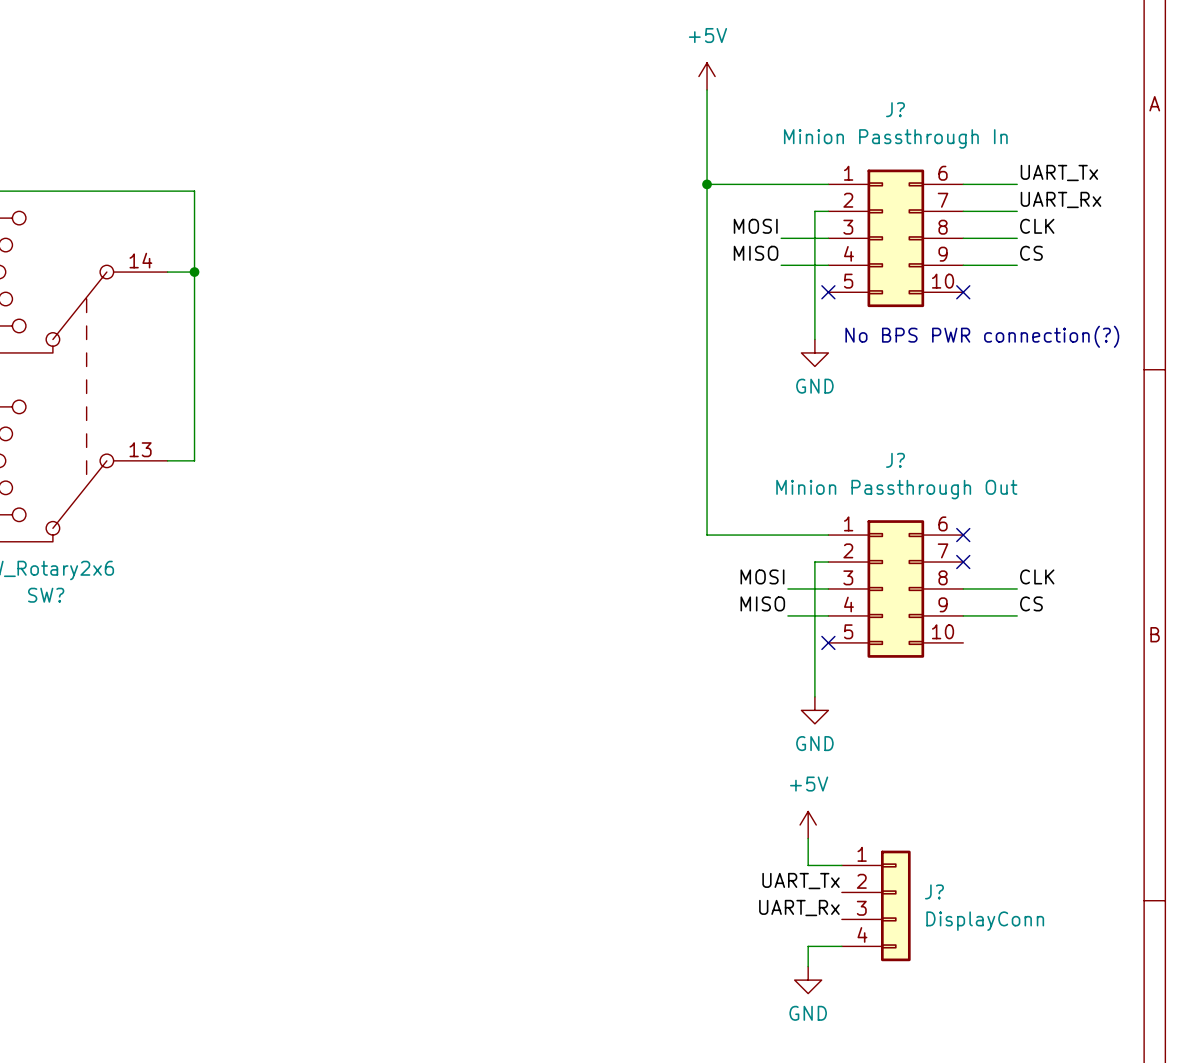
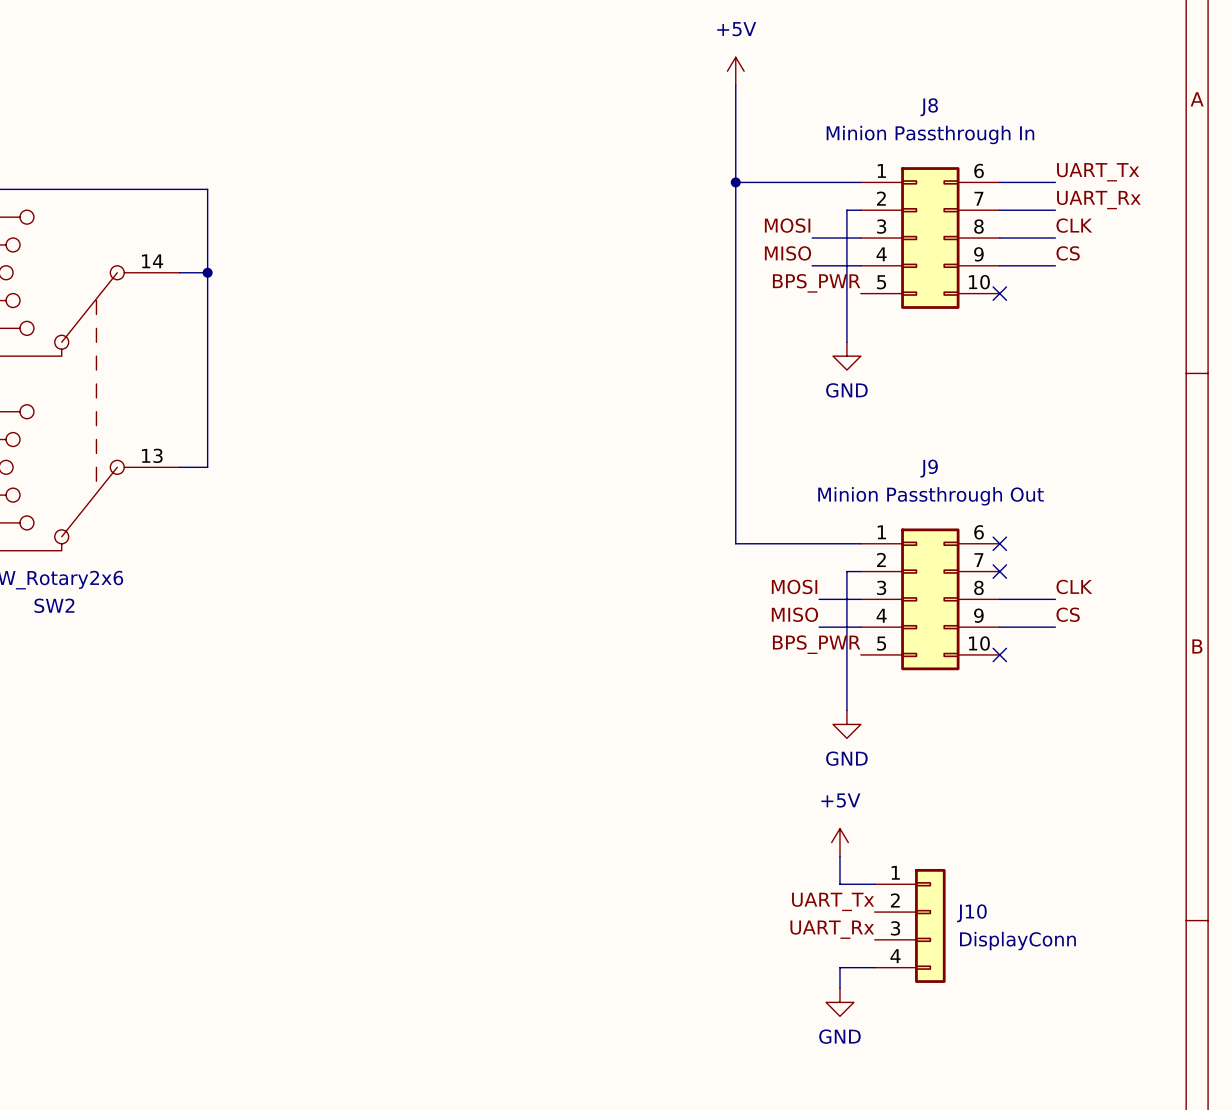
J? name: J? (895, 109) -> J8 (929, 107)
label: none -> BPS_PWR (816, 283)
no-connect mark: (828, 292) -> none
text: No BPS PWR connection(?) (982, 336) -> none
J? name: J? (895, 460) -> J9 (929, 468)
SW? name: SW? (46, 595) -> SW2 (54, 605)
label: none -> BPS_PWR (816, 644)
no-connect mark: (828, 642) -> none
no-connect mark: none -> (999, 654)
J? name: J? (934, 891) -> J10 (971, 913)

